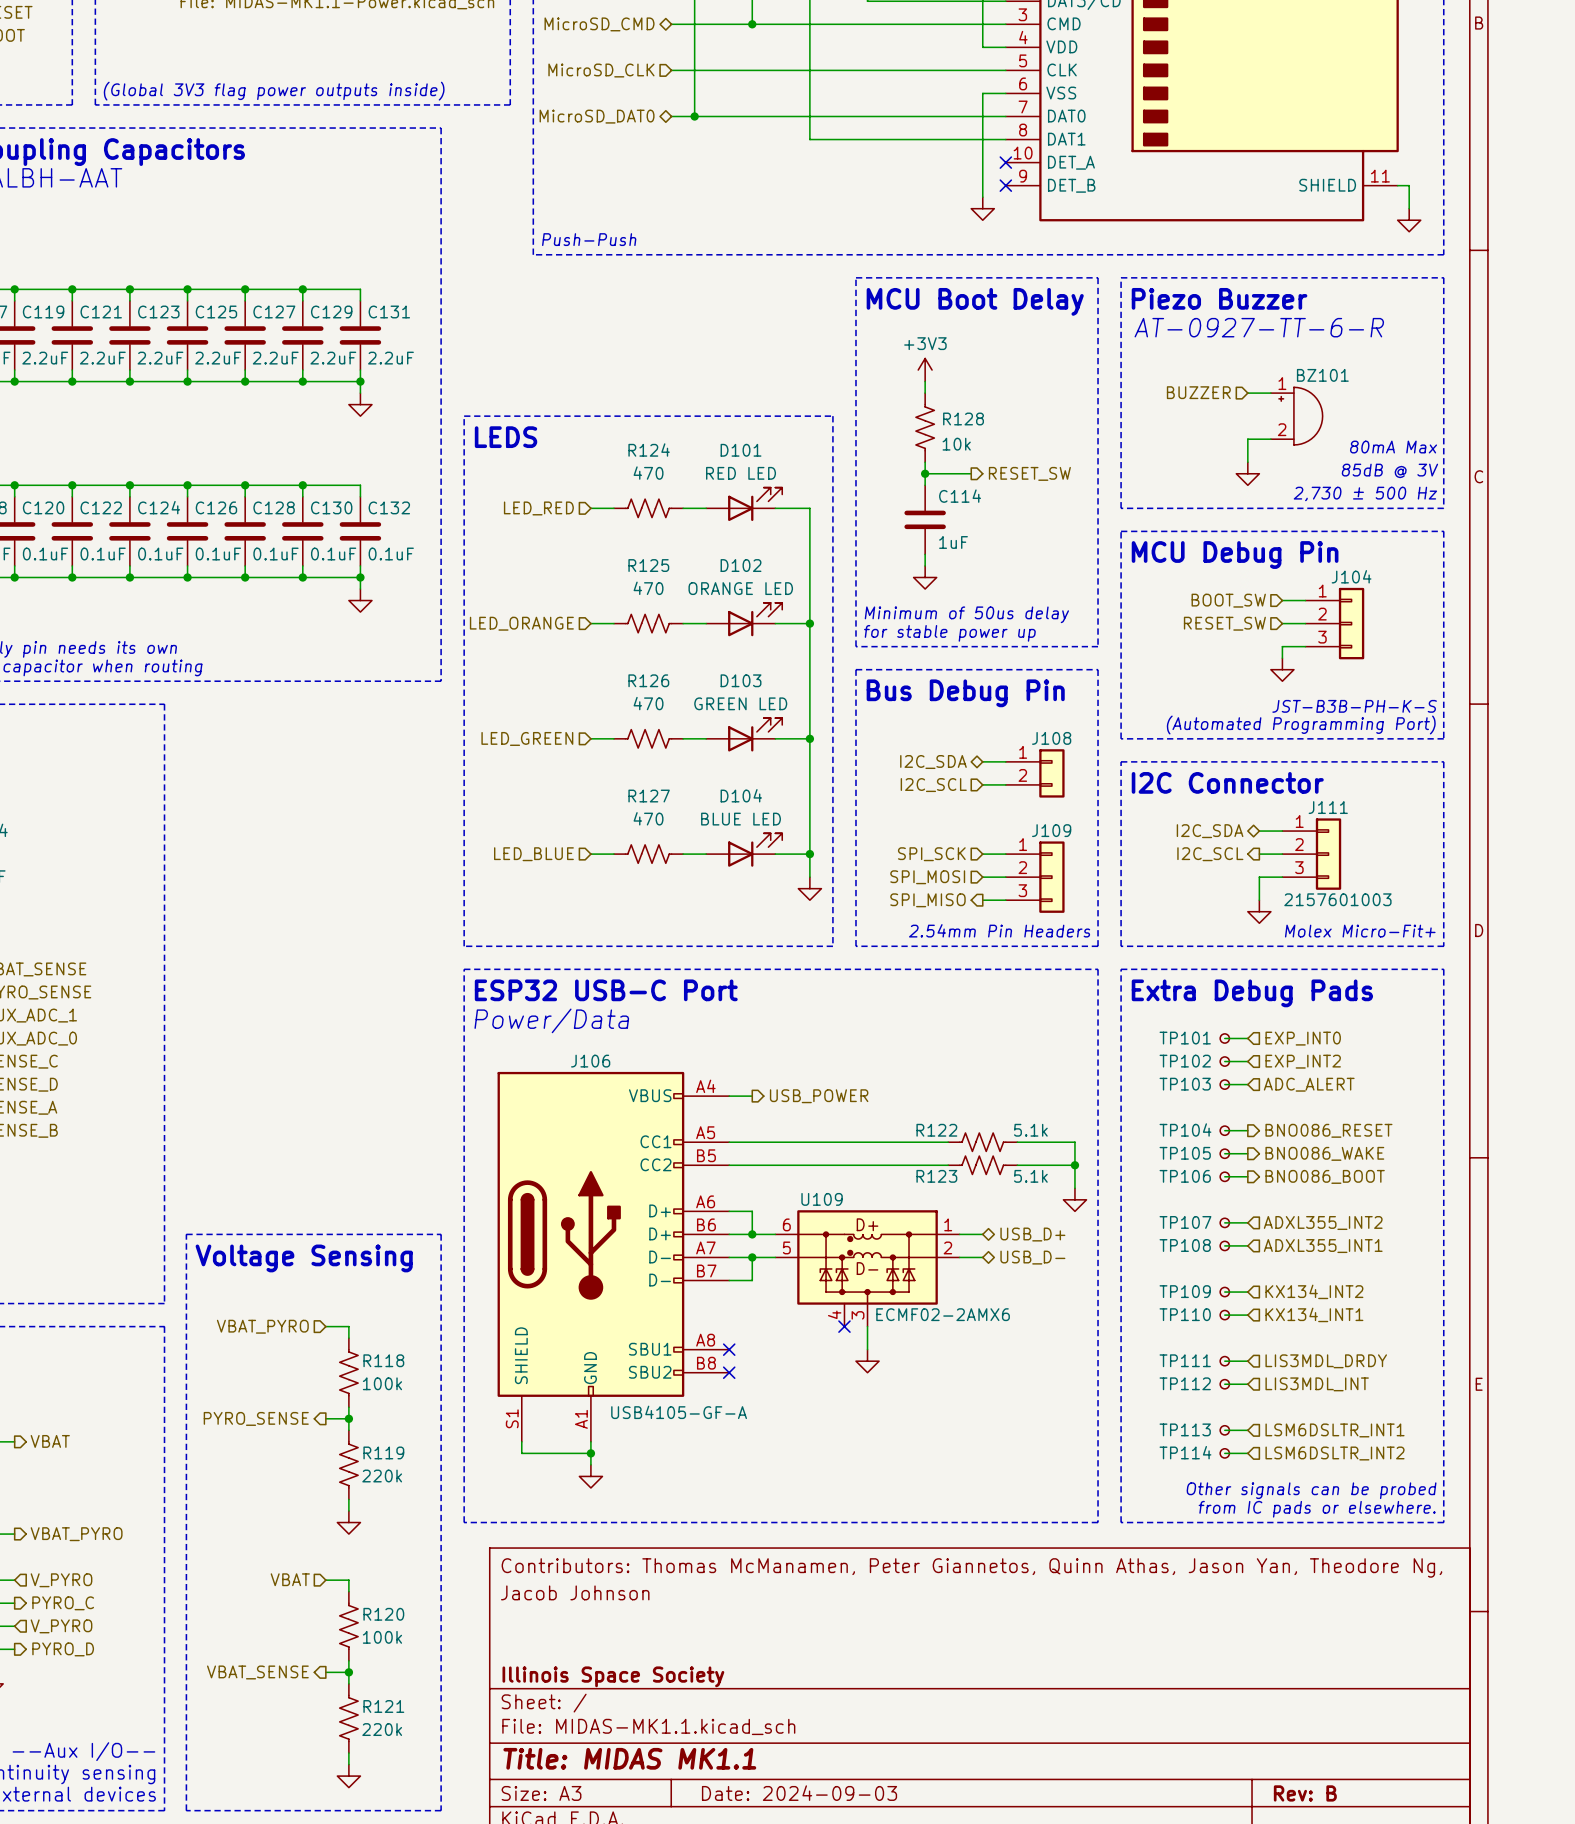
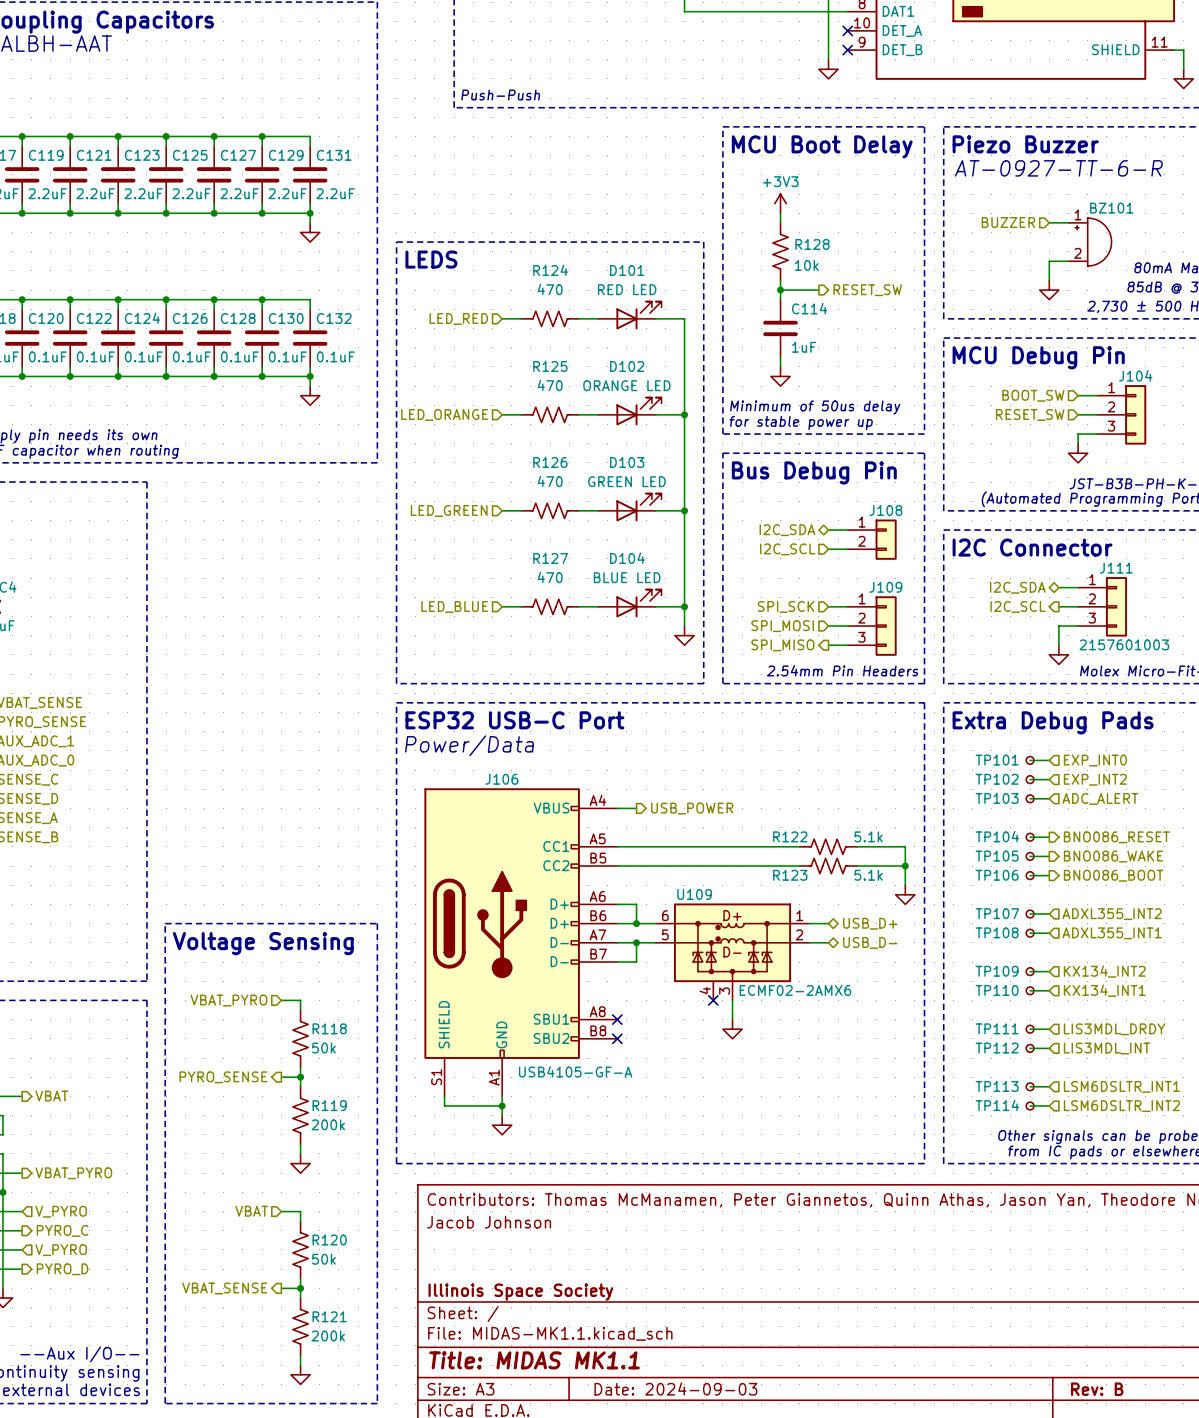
R118 value: 100k (382, 1383) -> 50k (323, 1048)
R119 value: 220k (382, 1476) -> 200k (328, 1124)
R120 value: 100k (382, 1637) -> 50k (323, 1259)
R121 value: 220k (382, 1729) -> 200k (328, 1336)

